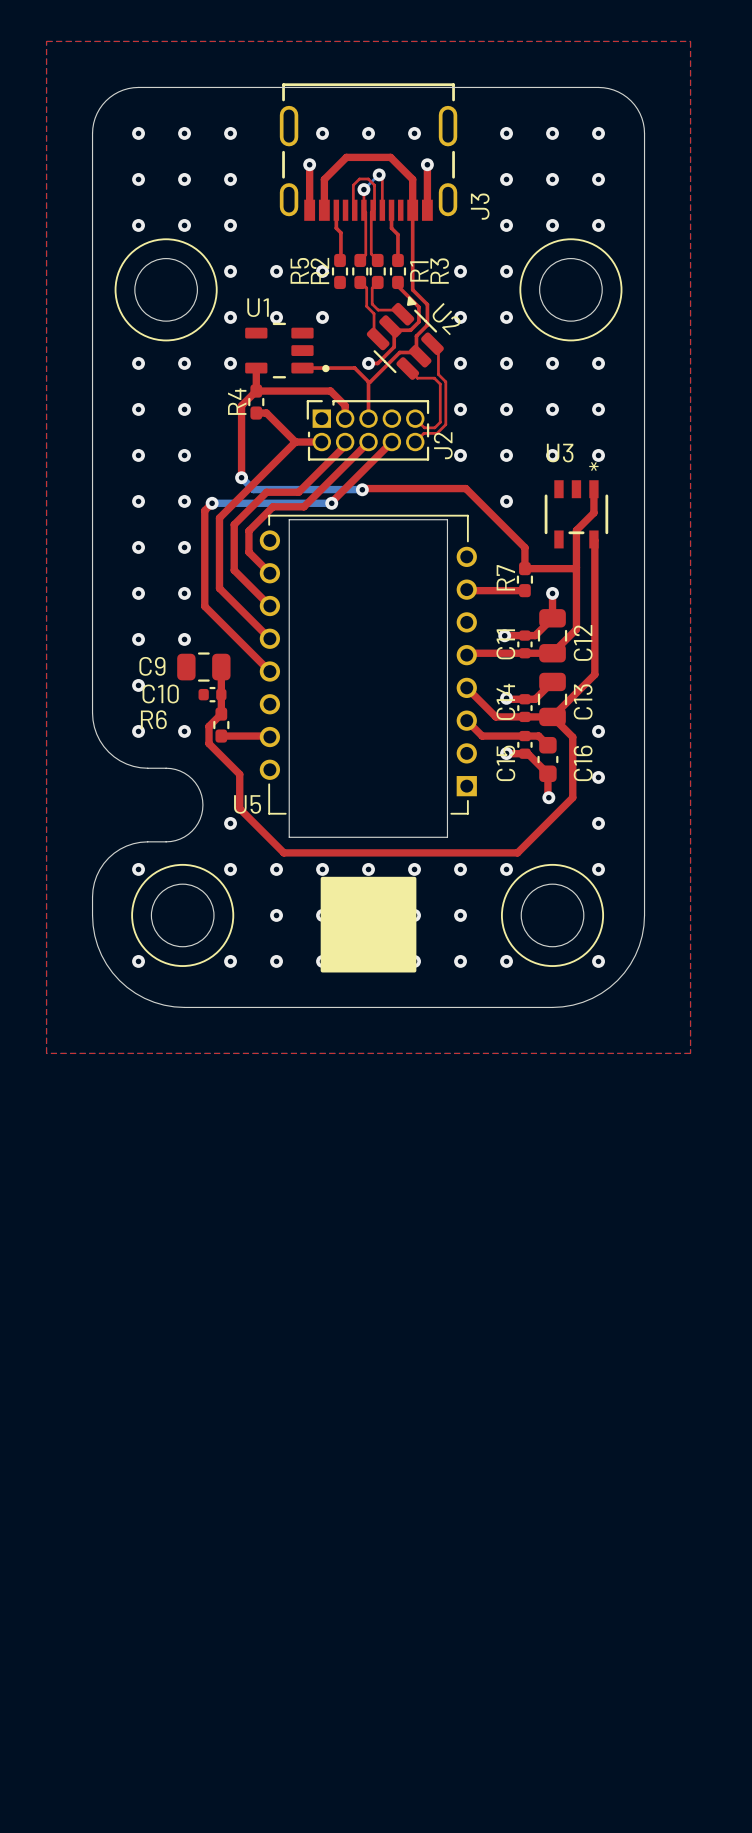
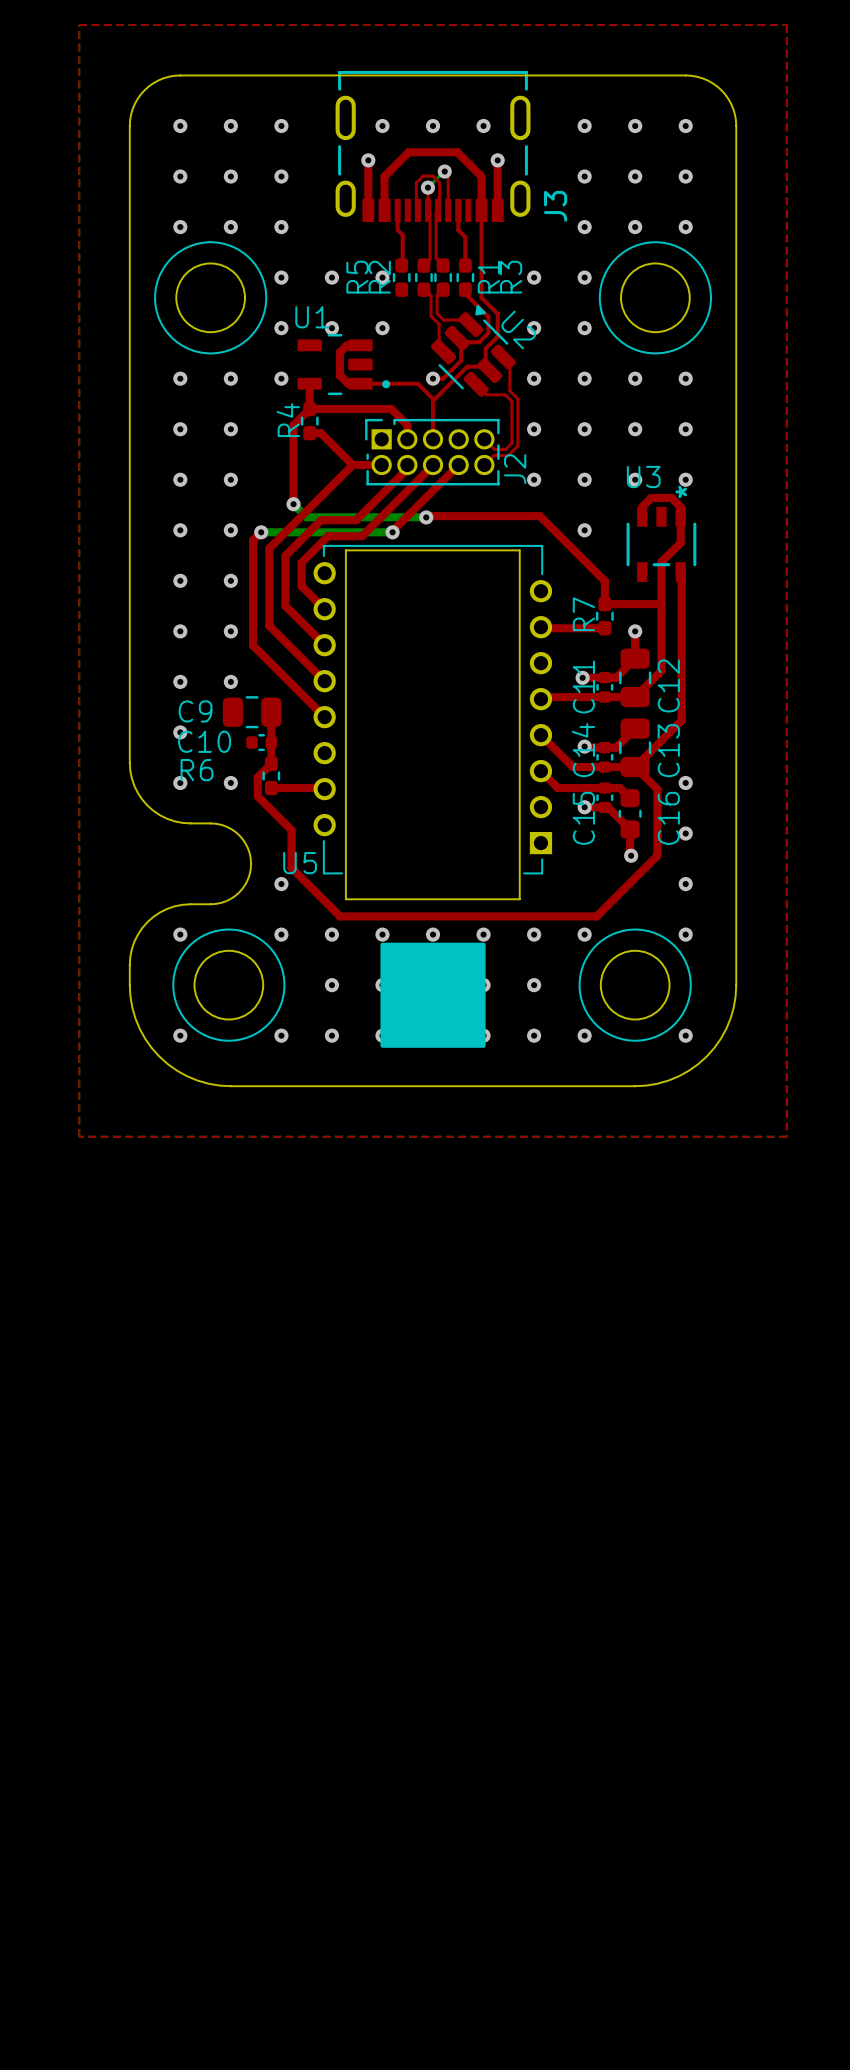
top track: none -> (360, 345) (347, 345) (340, 352) (340, 375) (348, 383) (360, 383)
top track: none -> (642, 516) (642, 507) (651, 497) (671, 497) (680, 507) (680, 516)

